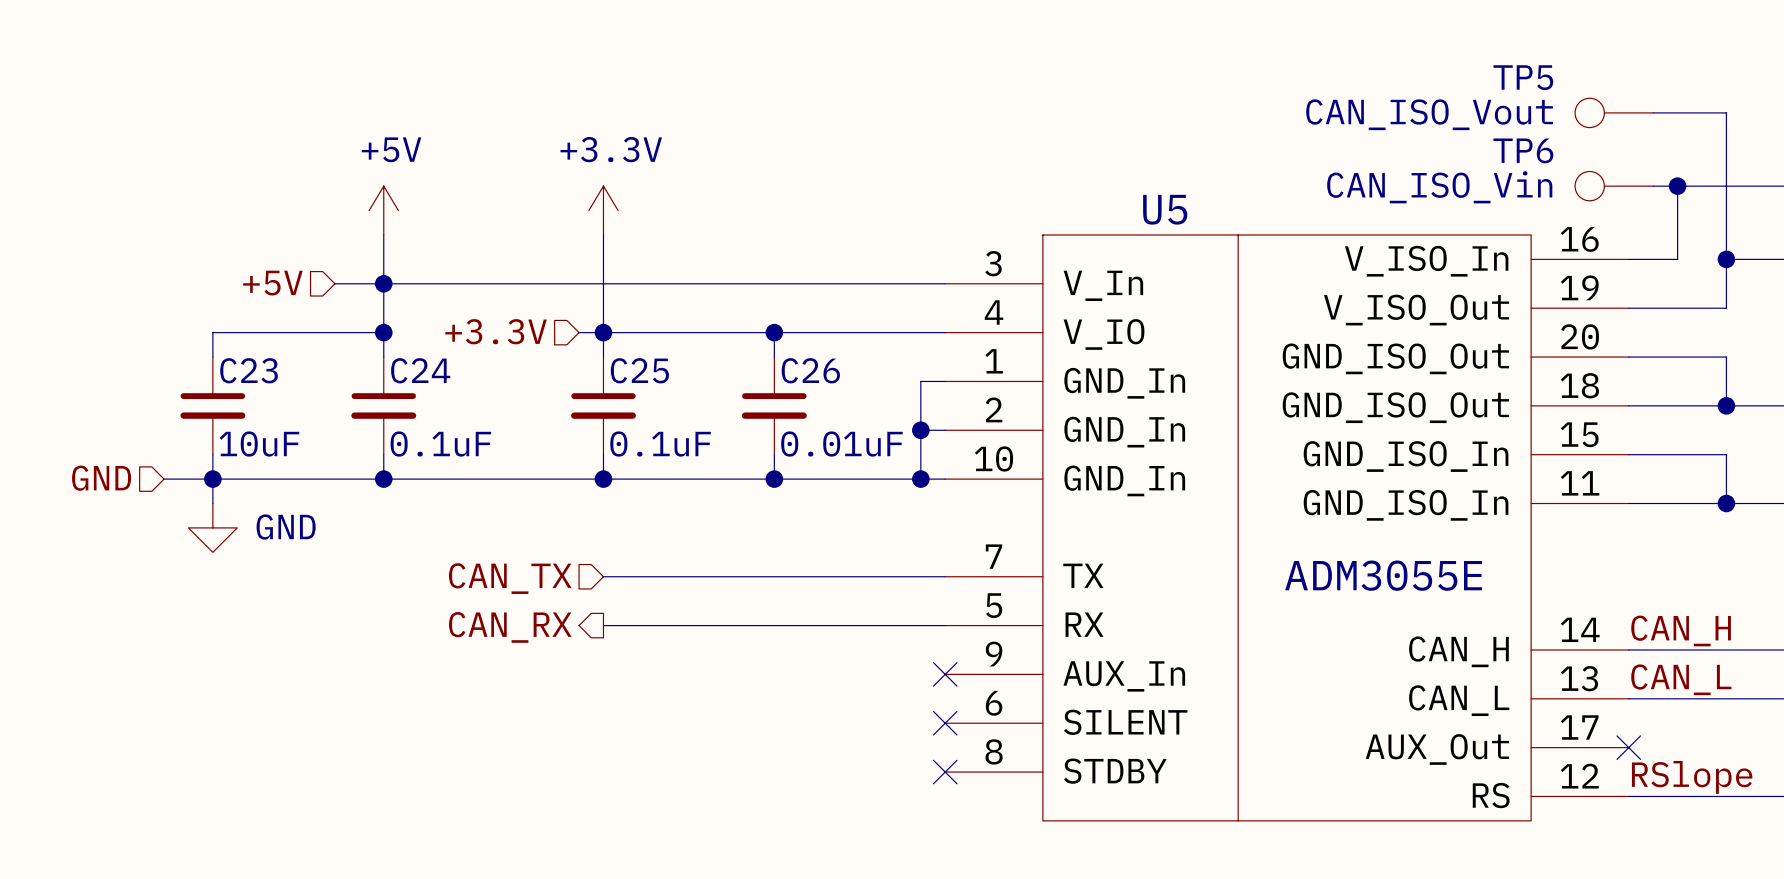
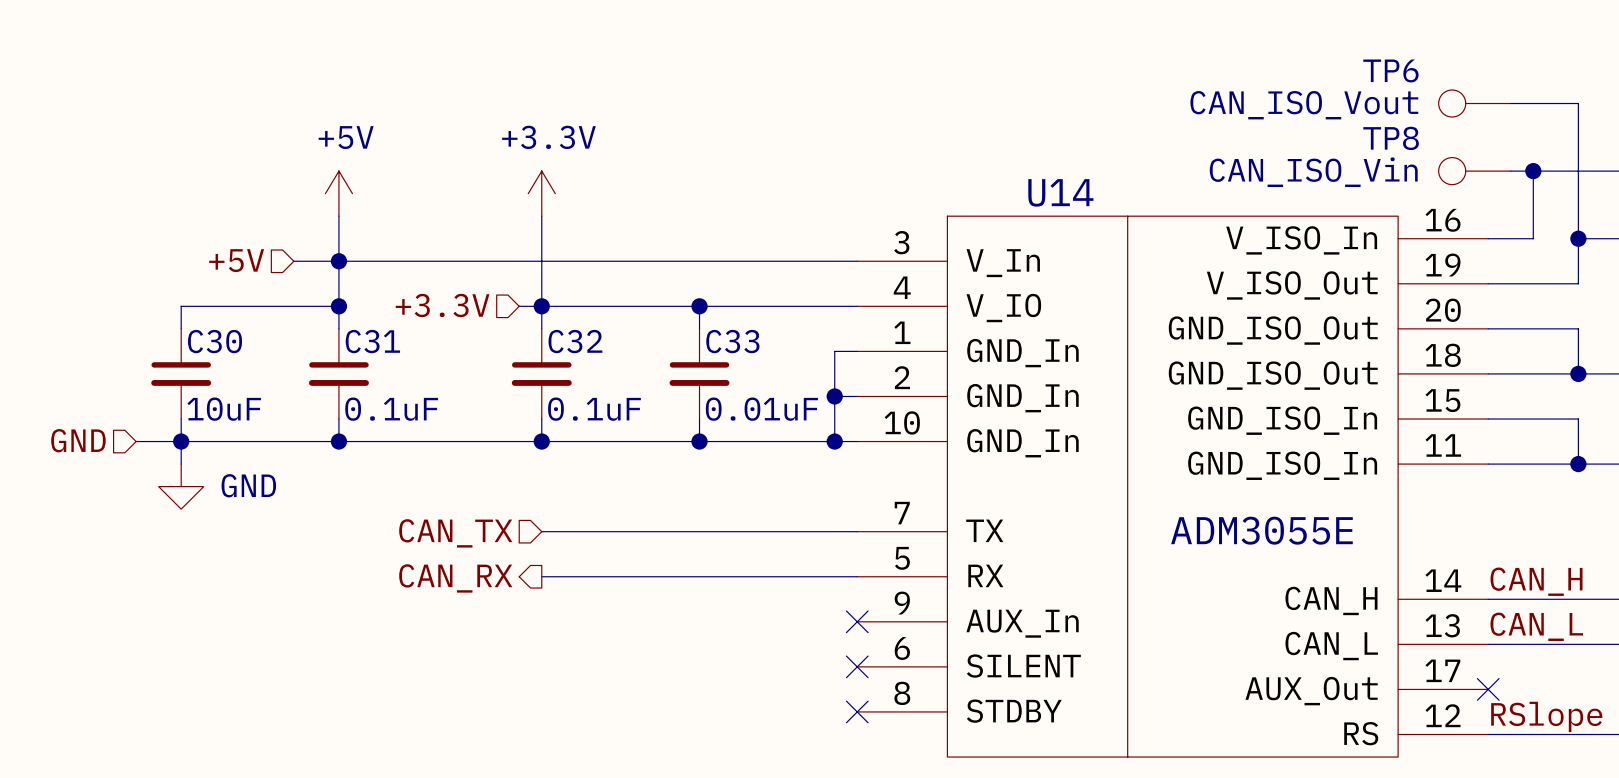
TP5 name: TP5 (1523, 77) -> TP6 (1390, 70)
TP6 name: TP6 (1523, 150) -> TP8 (1391, 138)
U5 name: U5 (1165, 209) -> U14 (1060, 192)
C23 name: C23 (249, 370) -> C30 (214, 341)
C24 name: C24 (420, 370) -> C31 (372, 341)
C25 name: C25 (639, 370) -> C32 (575, 341)
C26 name: C26 (810, 370) -> C33 (732, 341)

